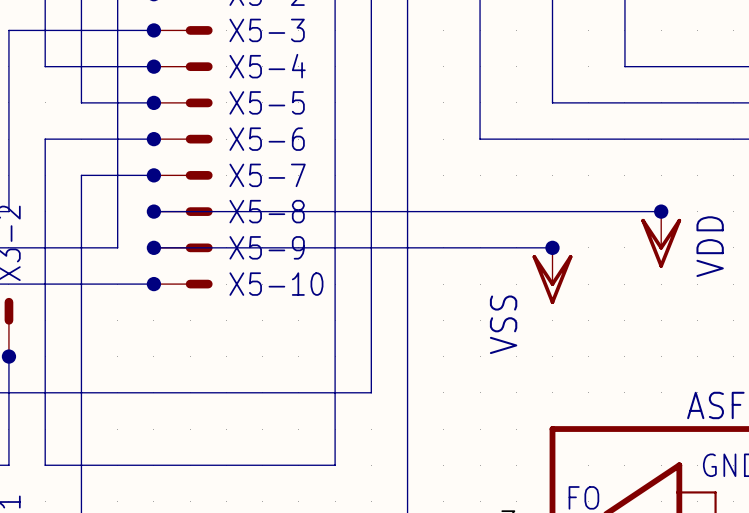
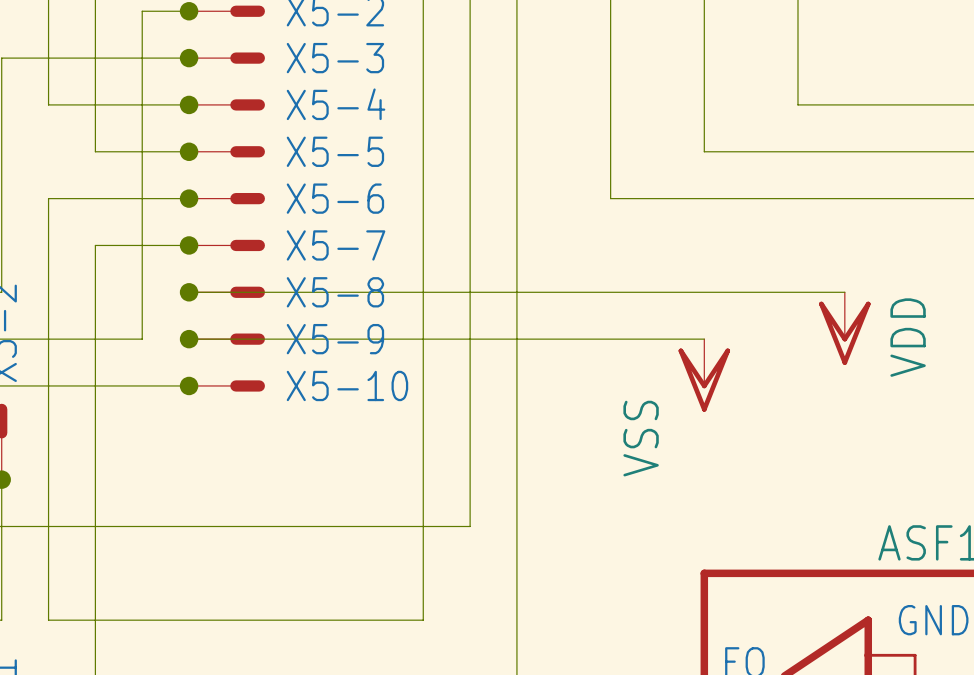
junction: (661, 211) -> none
junction: (552, 247) -> none

